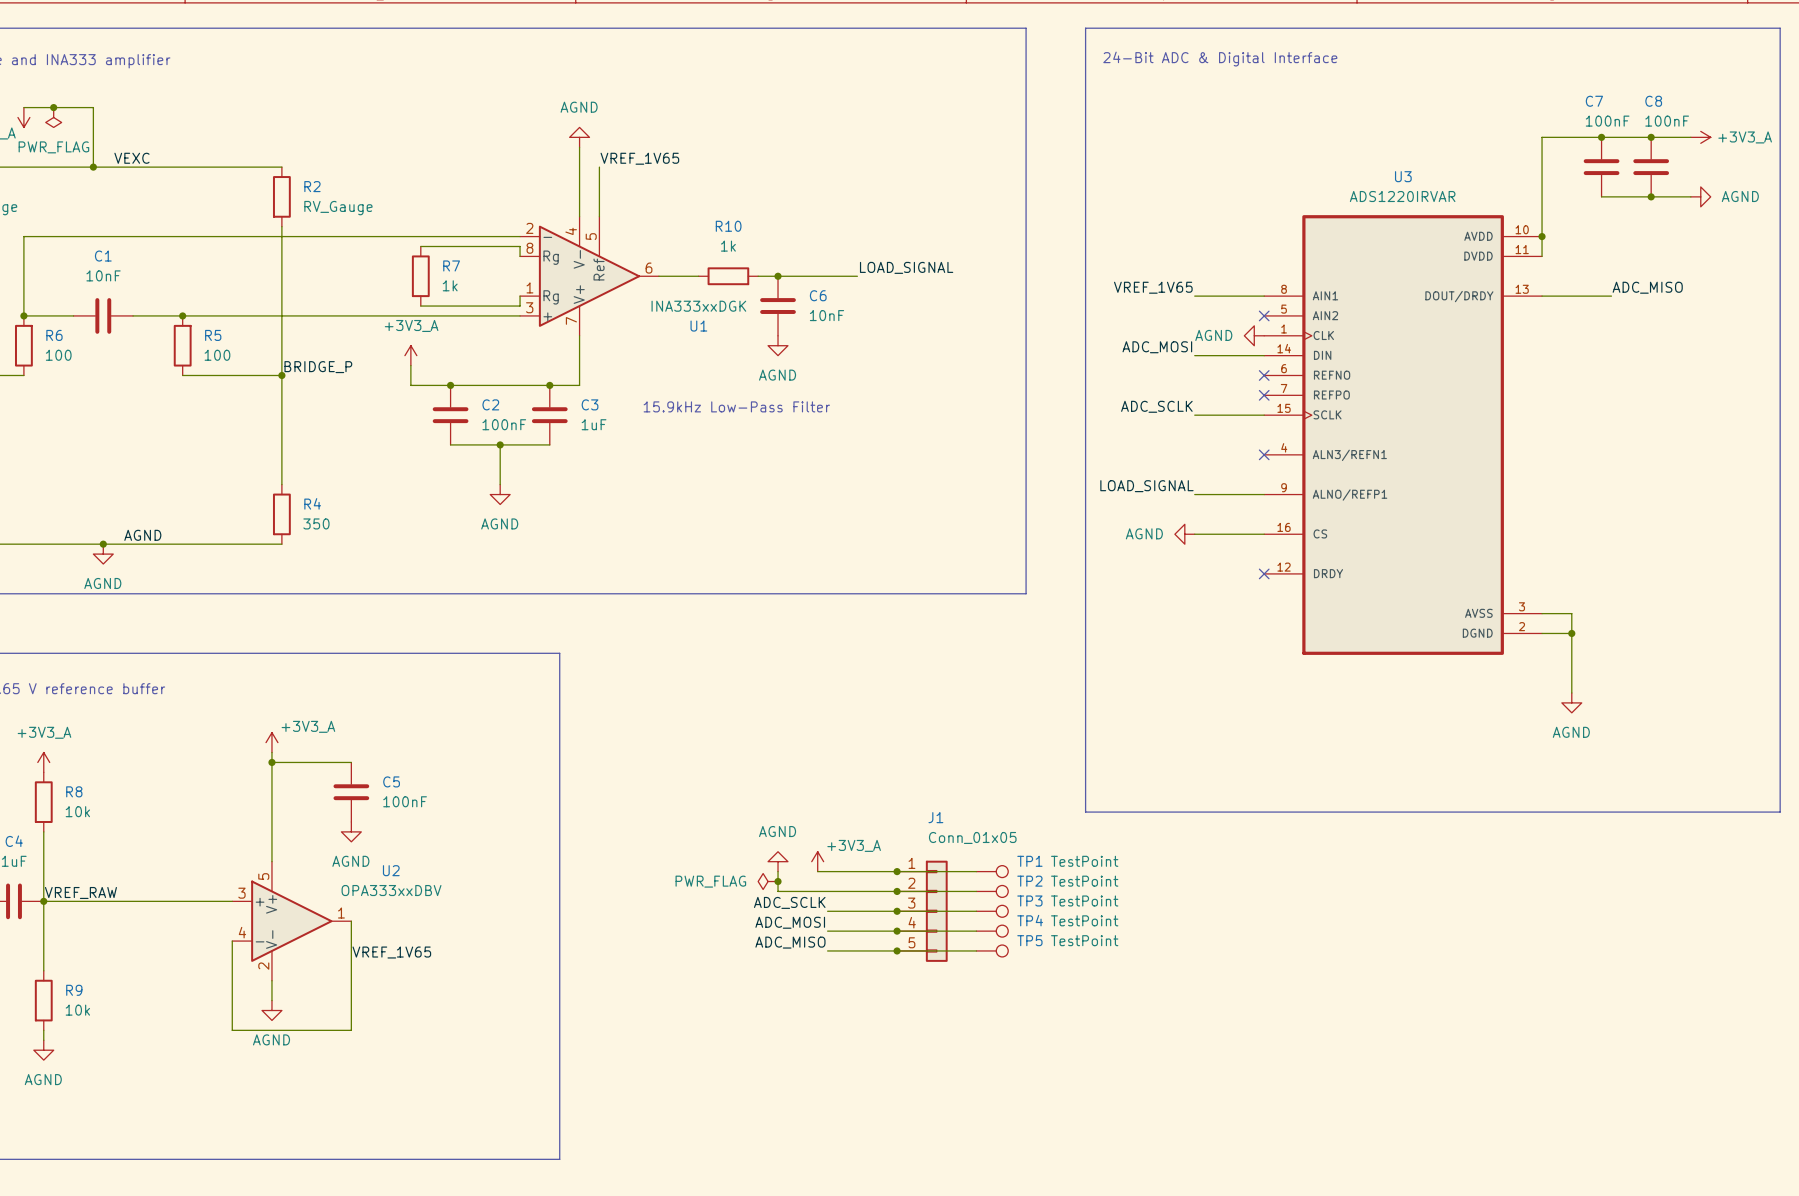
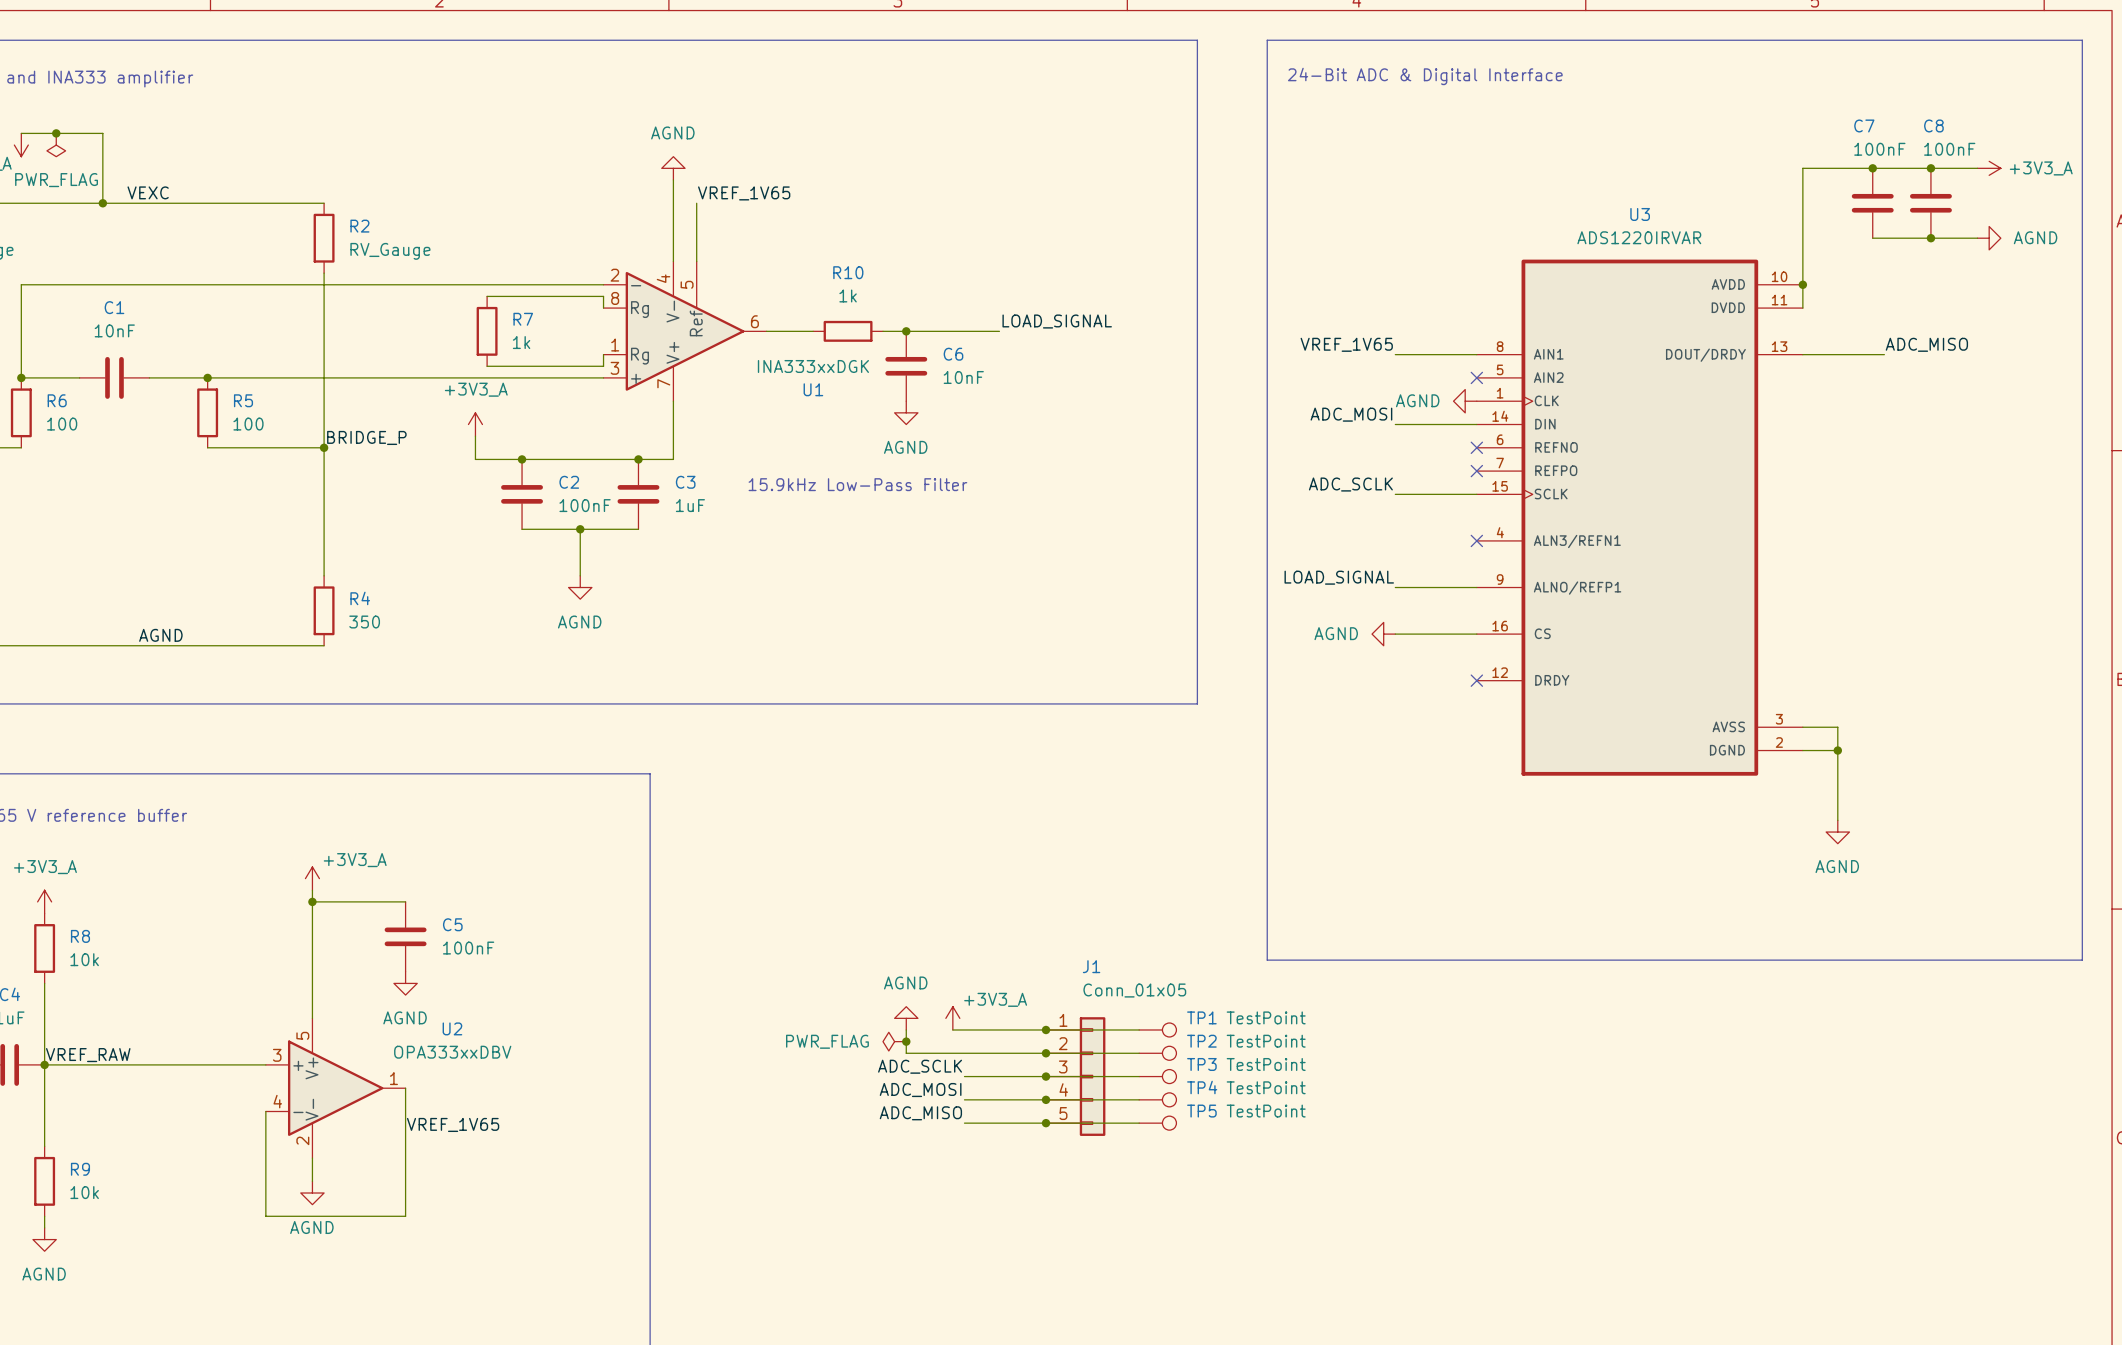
junction: (103, 544) -> none
power symbol: AGND (103, 554) -> none

